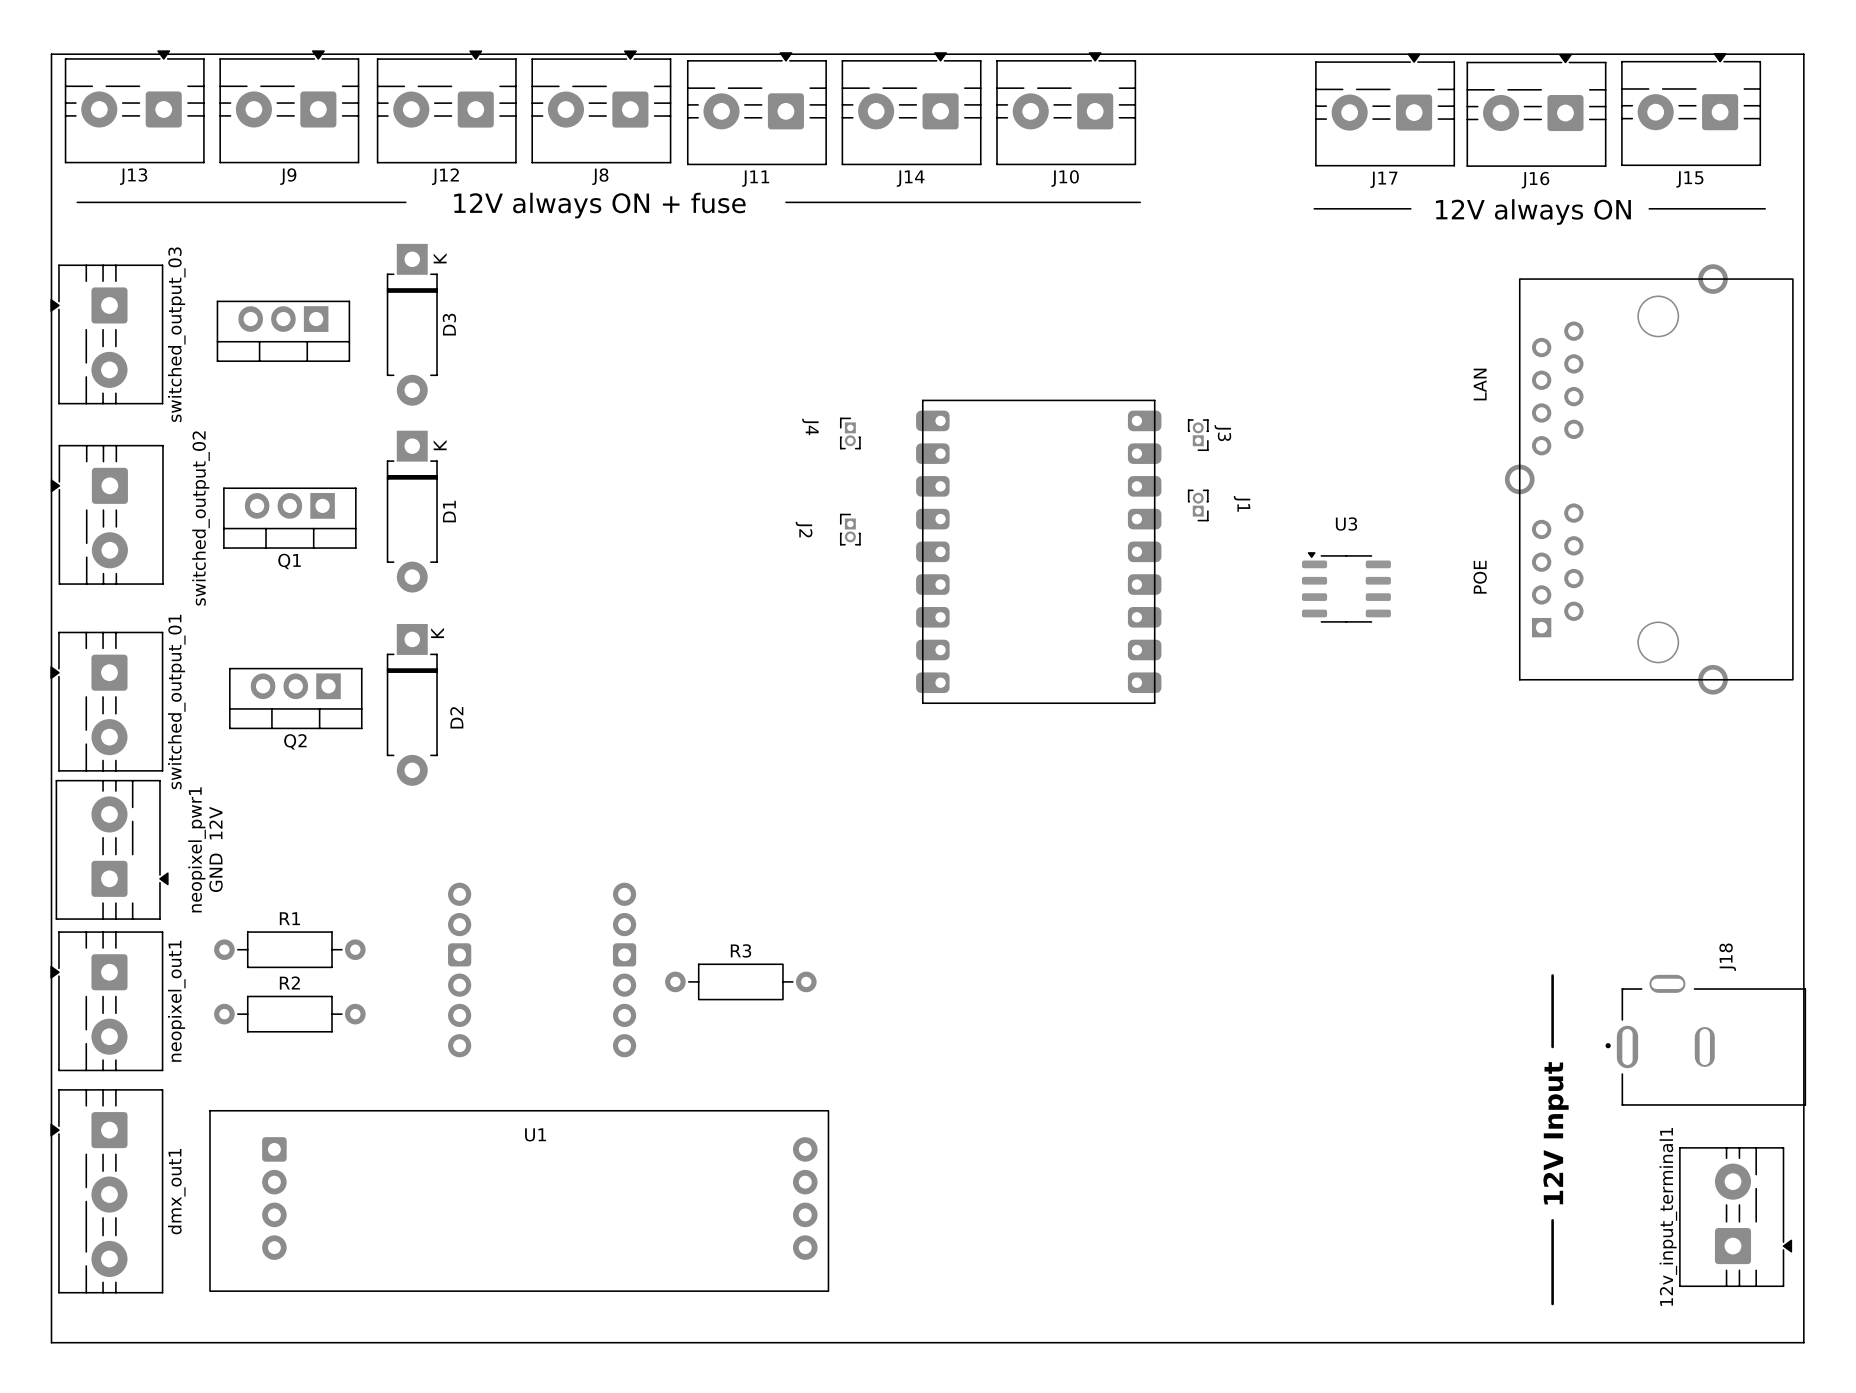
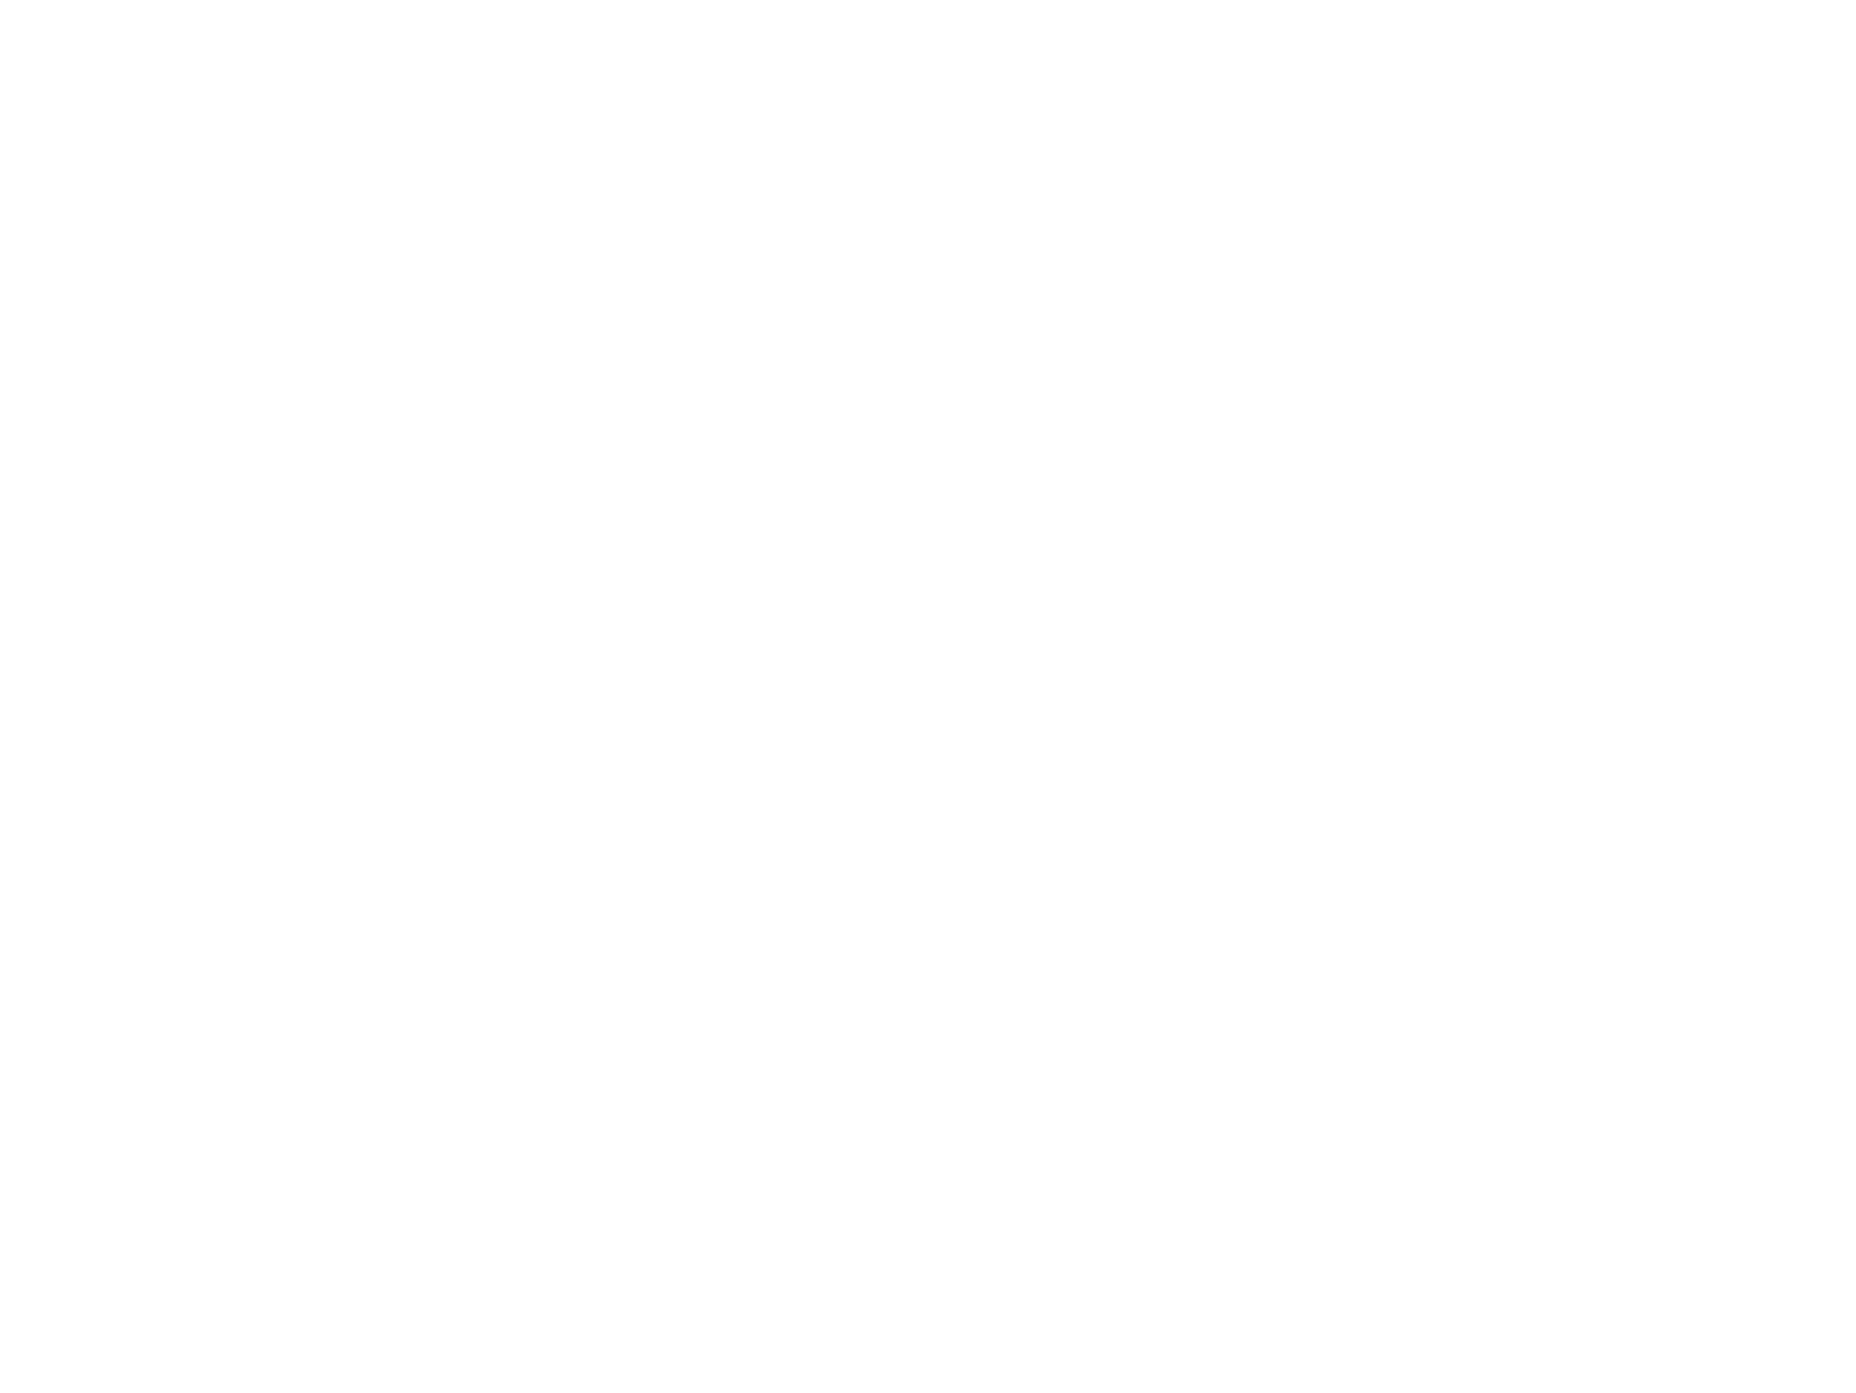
board edge: (51, 54) (1803, 54) (1803, 1342) (51, 1342) (51, 54) -> none
J13: (134, 106) -> none
J9: (289, 106) -> none
J12: (446, 106) -> none
J8: (601, 106) -> none
J11: (756, 108) -> none
J14: (911, 108) -> none
J10: (1066, 108) -> none
J17: (1385, 109) -> none
J15: (1691, 109) -> none
J16: (1536, 110) -> none
line: (77, 202) (405, 202) -> none
line: (785, 202) (1140, 202) -> none
text: 12V always ON + fuse (599, 205) -> none
line: (1314, 208) (1410, 208) -> none
line: (1649, 208) (1765, 208) -> none
text: 12V always ON (1533, 212) -> none
D3: (412, 324) -> none
part: (283, 331) -> none
switched_output_03: (106, 334) -> none
text: LAN (1480, 384) -> none
J4: (850, 433) -> none
J3: (1198, 435) -> none
part: (1649, 479) -> none
J1: (1198, 505) -> none
D1: (412, 511) -> none
switched_output_02: (107, 514) -> none
Q1: (289, 518) -> none
J2: (850, 529) -> none
part: (1038, 551) -> none
text: POE (1480, 577) -> none
U3: (1346, 587) -> none
Q2: (295, 698) -> none
switched_output_01: (106, 701) -> none
D2: (412, 704) -> none
part: (112, 849) -> none
R1: (289, 949) -> none
U1: (542, 970) -> none
line: (1552, 975) (1552, 1046) -> none
R3: (740, 981) -> none
neopixel_out1: (106, 1001) -> none
R2: (289, 1014) -> none
J18: (1705, 1040) -> none
text: 12V Input (1556, 1133) -> none
dmx_out1: (106, 1191) -> none
part: (519, 1200) -> none
12v_input_terminal1: (1735, 1217) -> none
line: (1552, 1220) (1552, 1304) -> none

